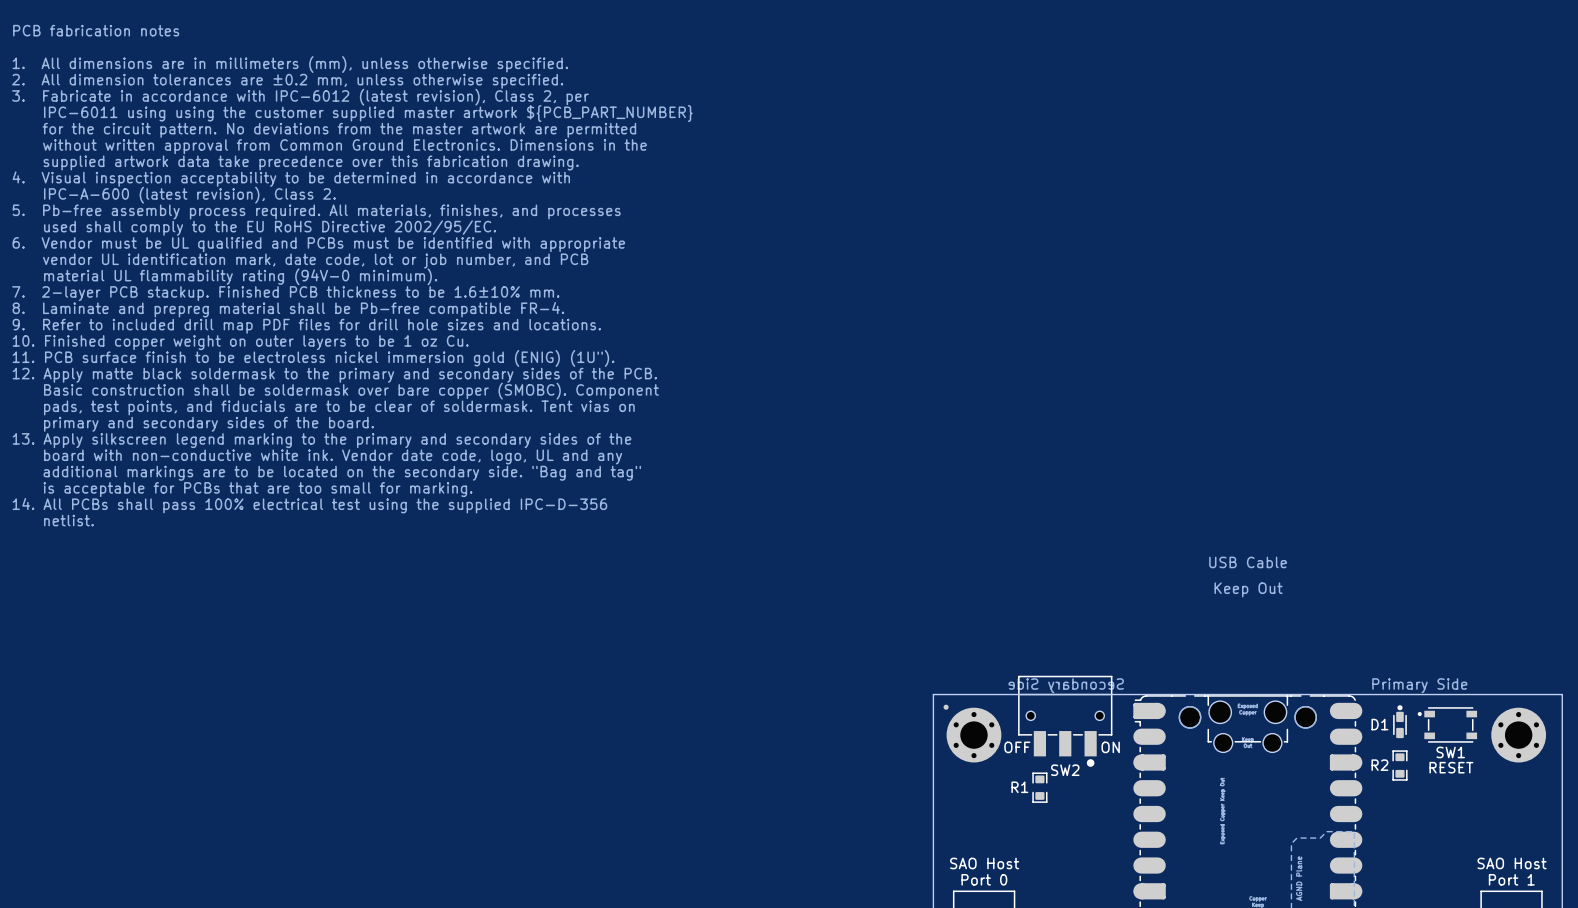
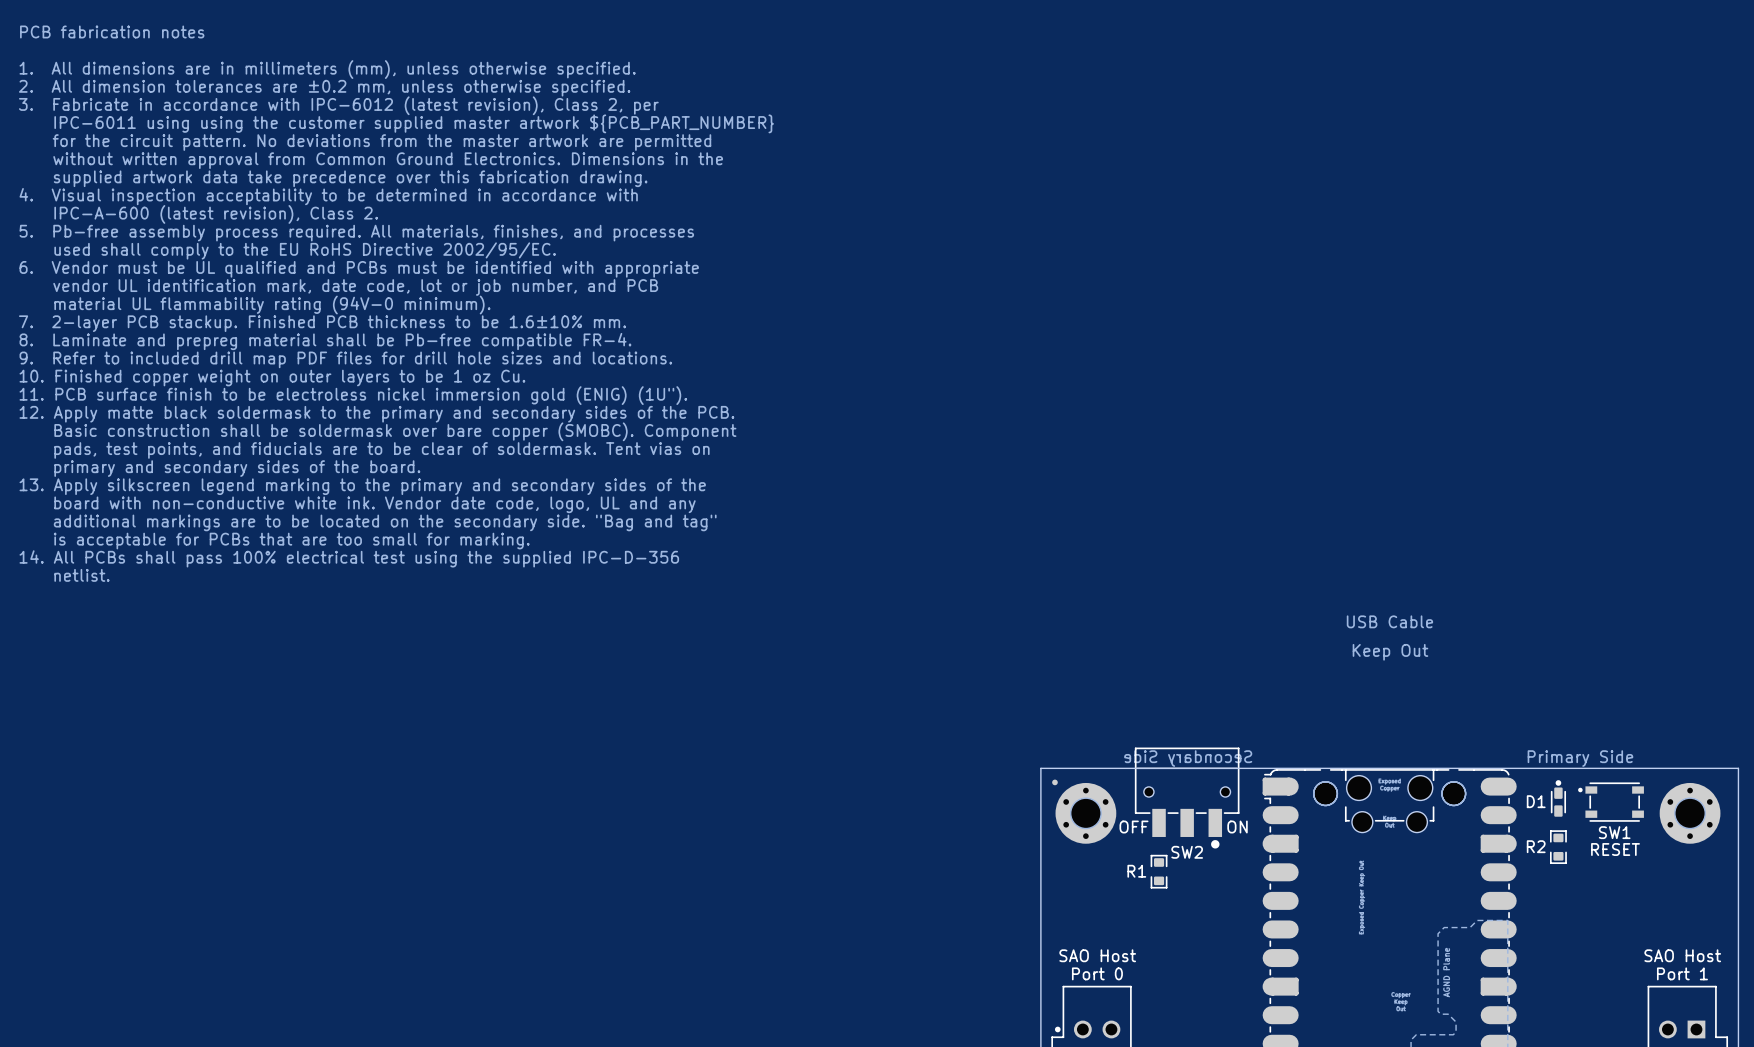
part footprint: [1179, 706, 1201, 728] -> [1313, 781, 1338, 807]
part footprint: [1295, 706, 1317, 728] -> [1441, 781, 1467, 807]
part footprint: [946, 707, 1002, 763] -> [1055, 782, 1117, 844]
part footprint: [1491, 707, 1547, 763] -> [1659, 782, 1721, 844]

